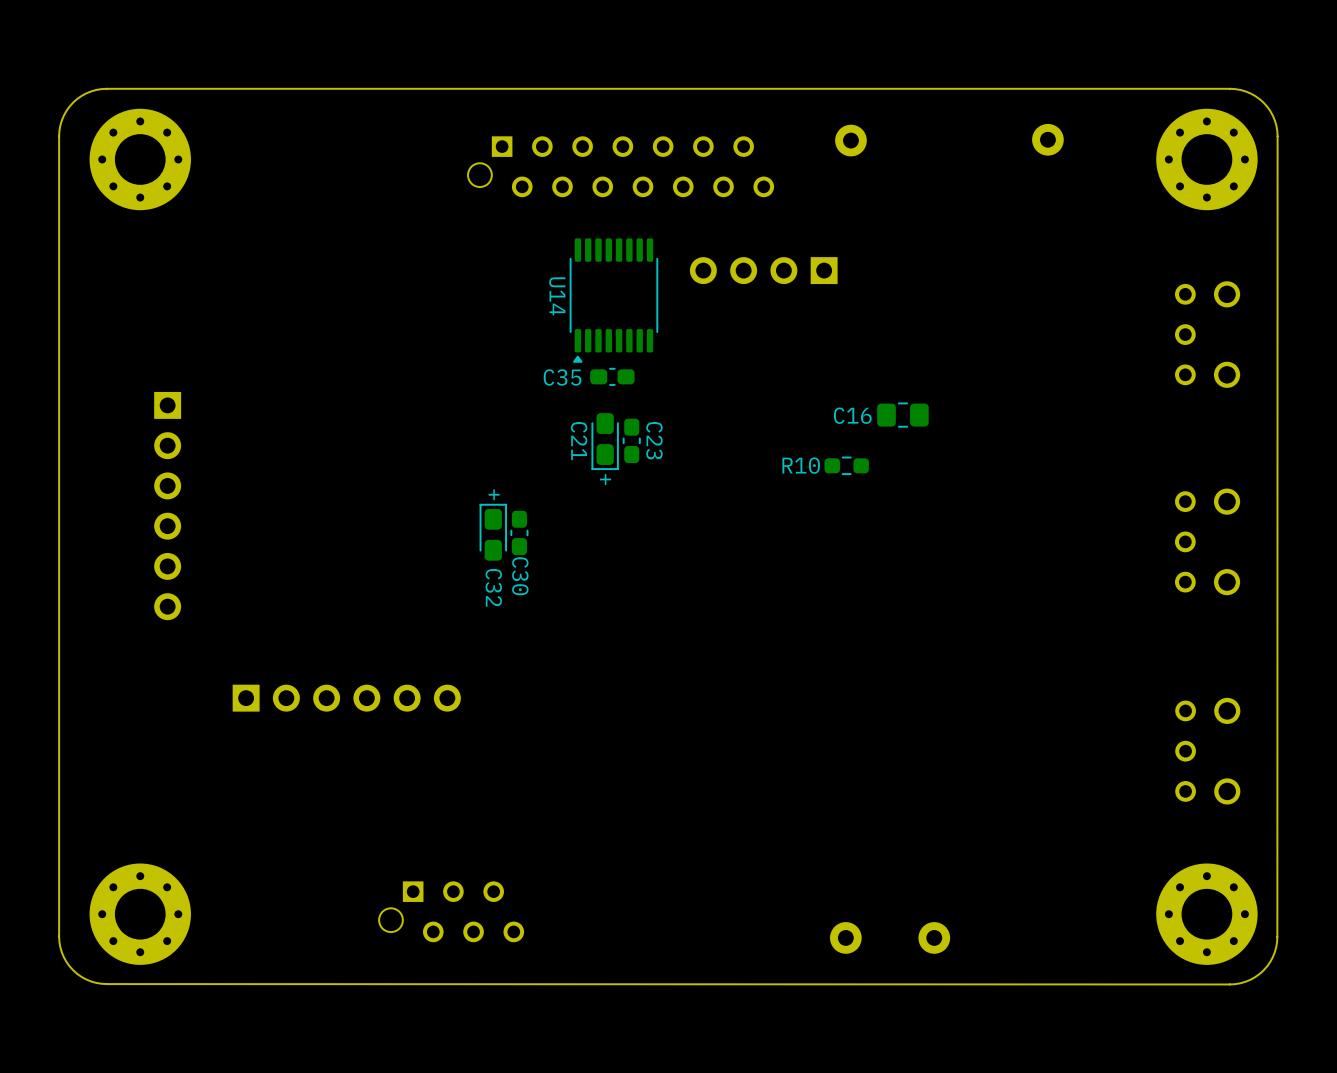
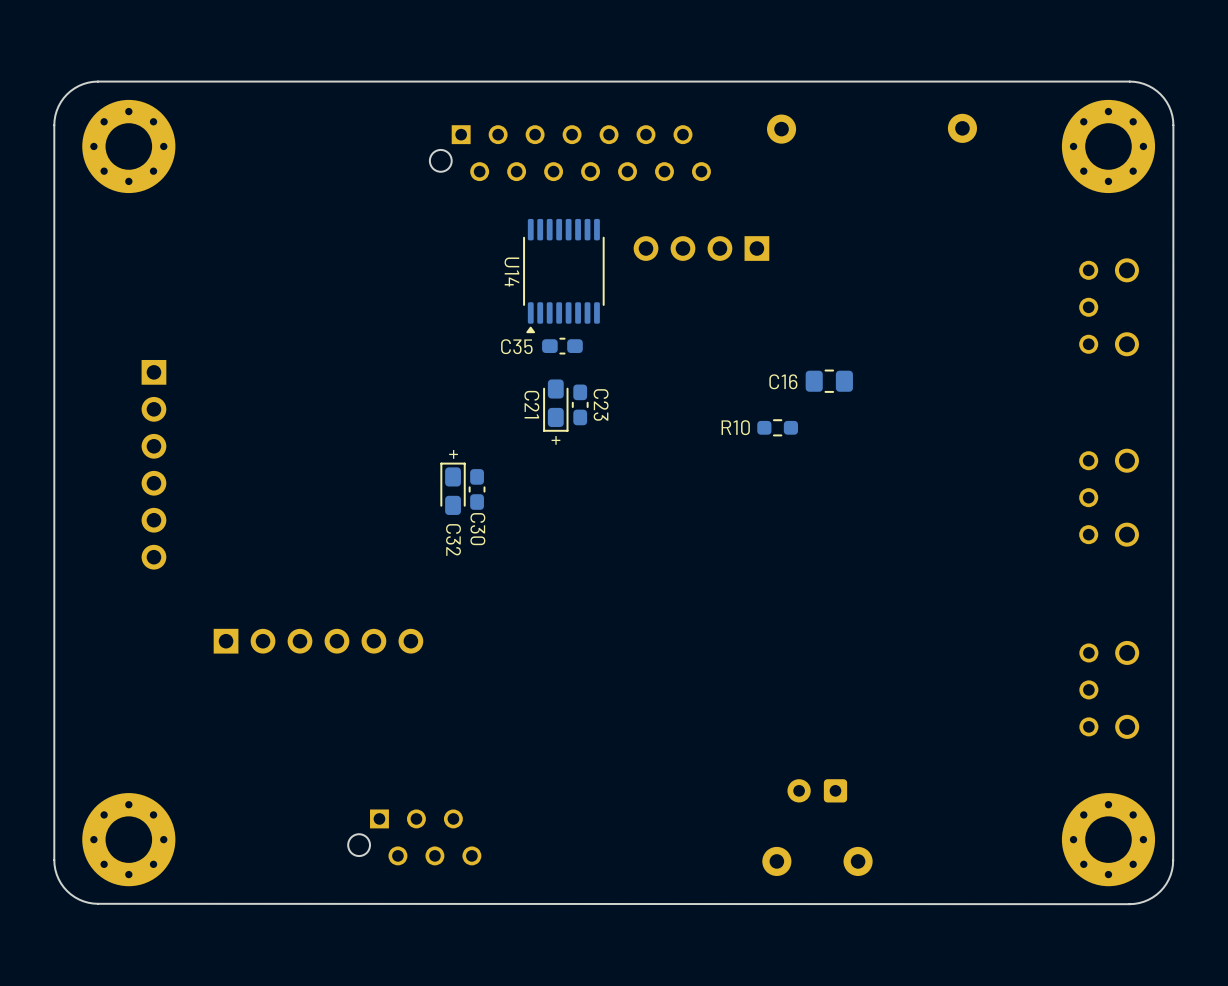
part: none -> (817, 790)

